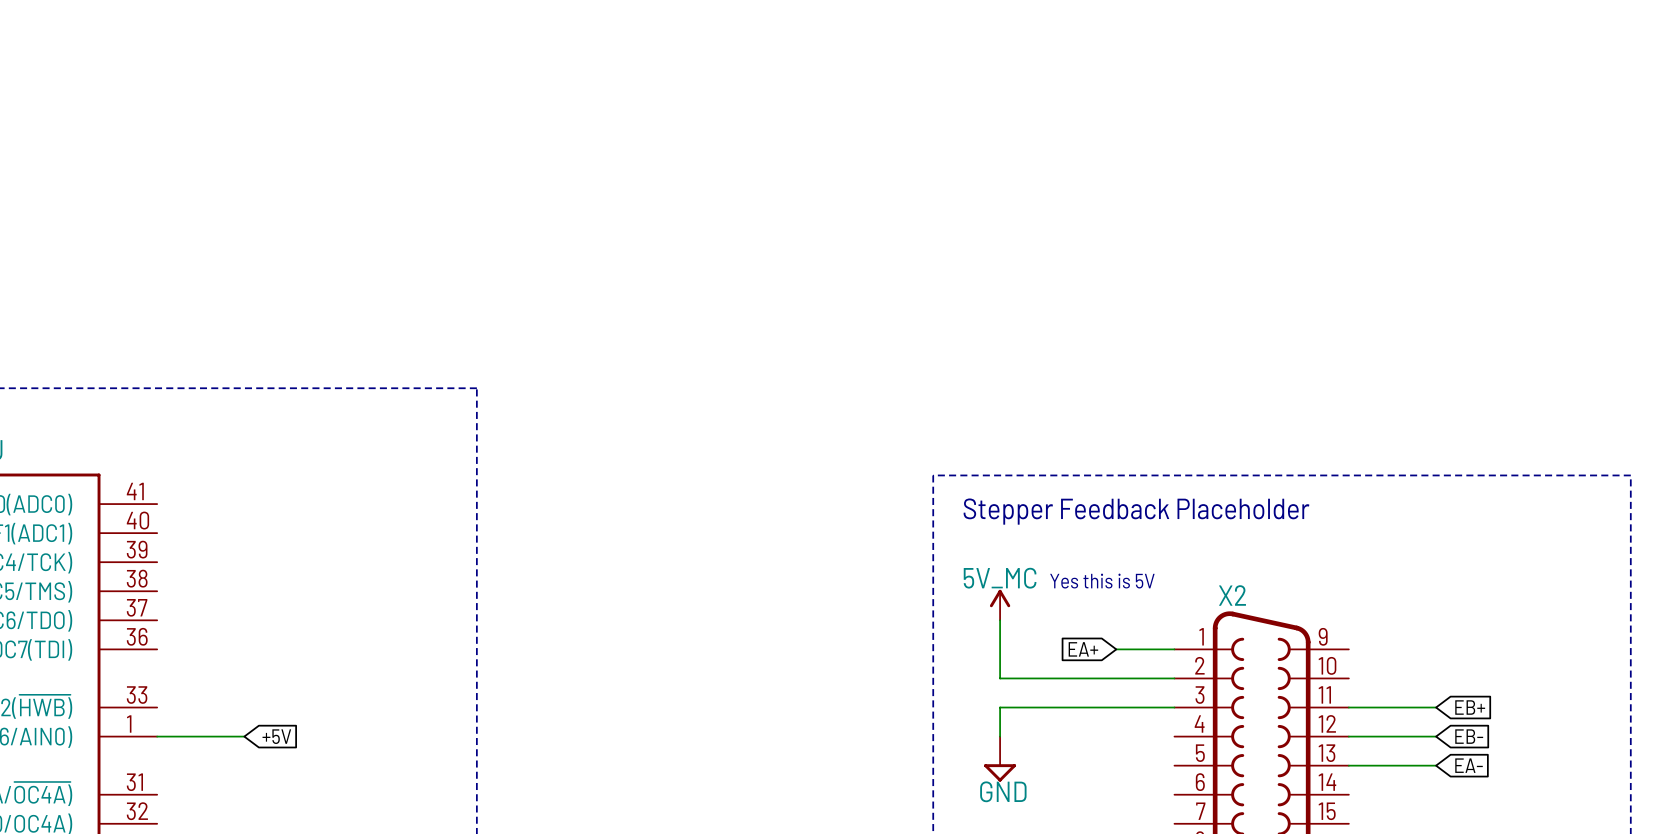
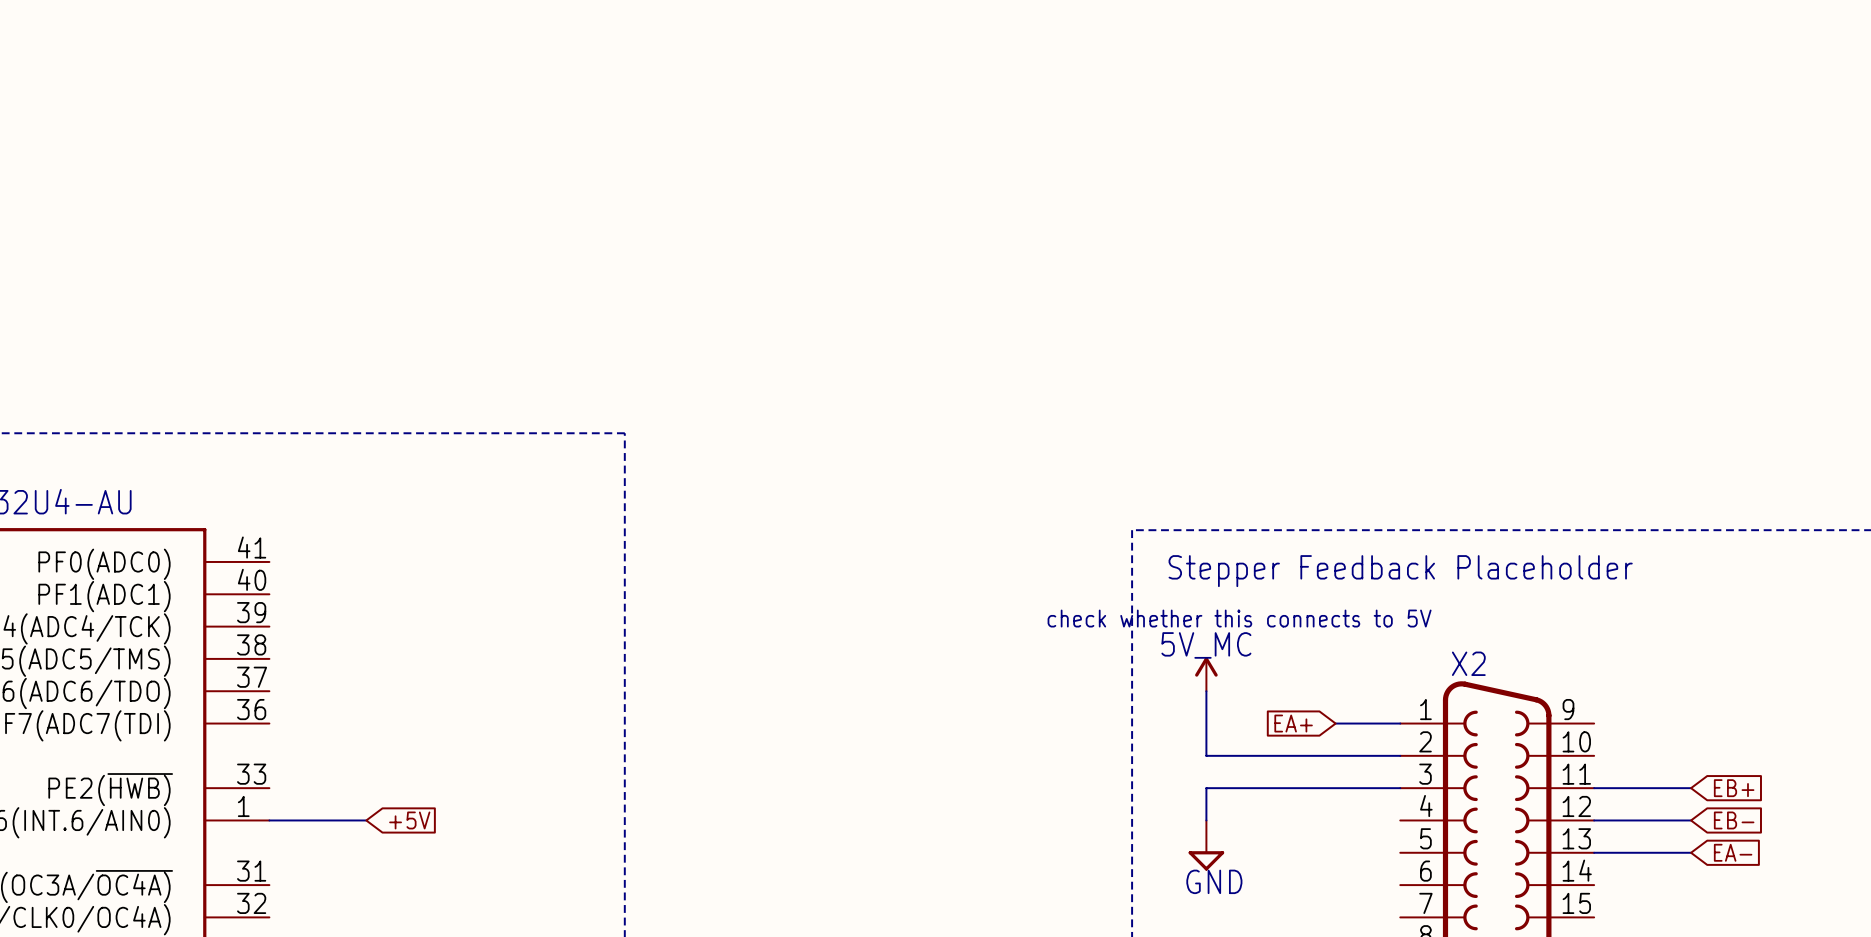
text: none -> check whether this connects to 5V (1239, 618)
text: Yes this is 5V (1102, 581) -> none

